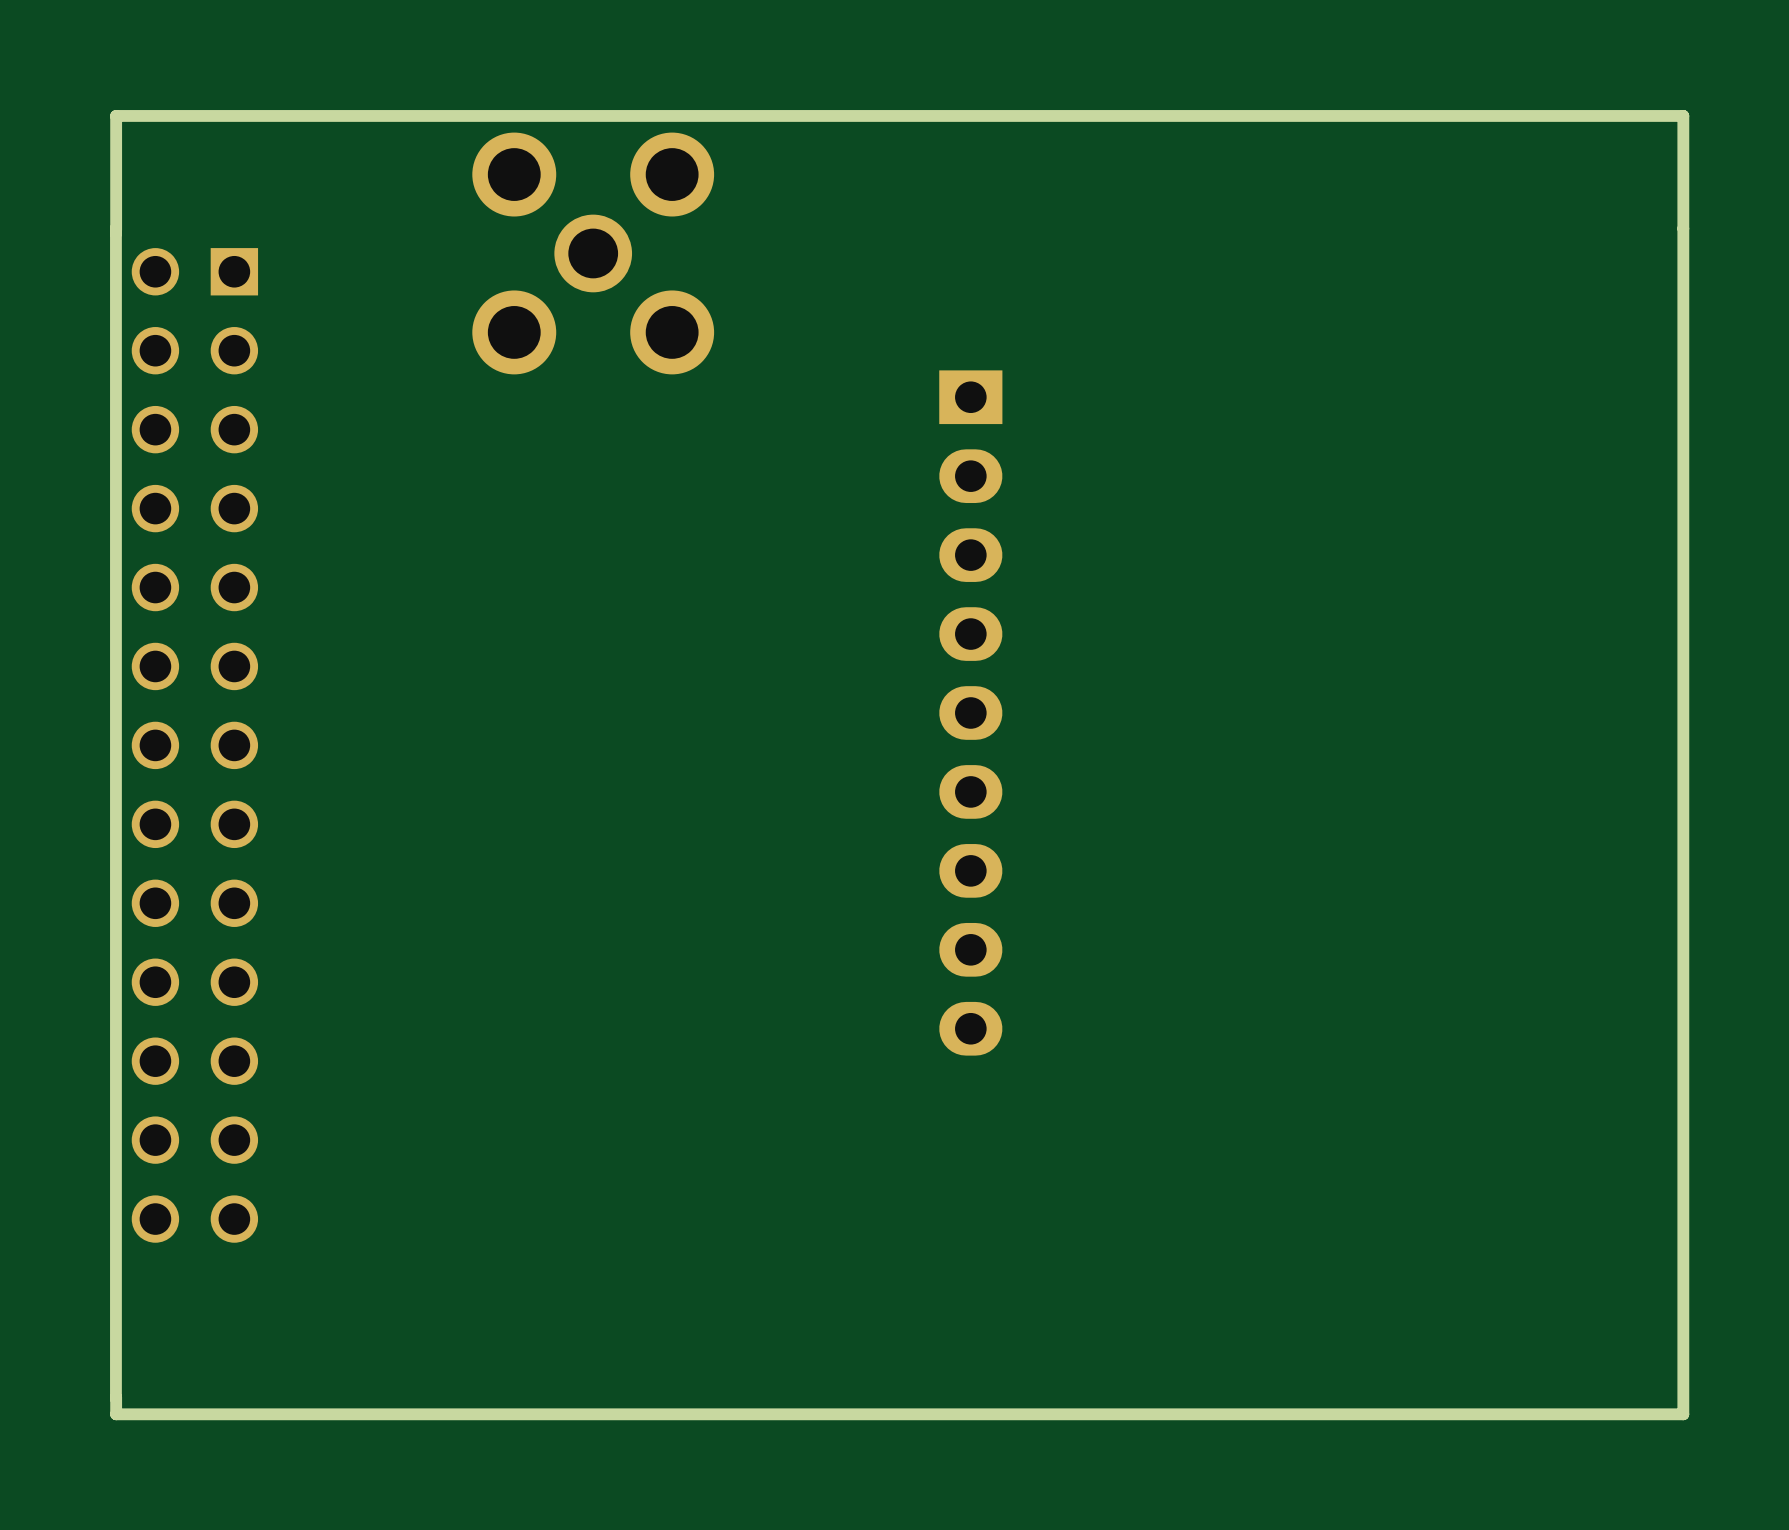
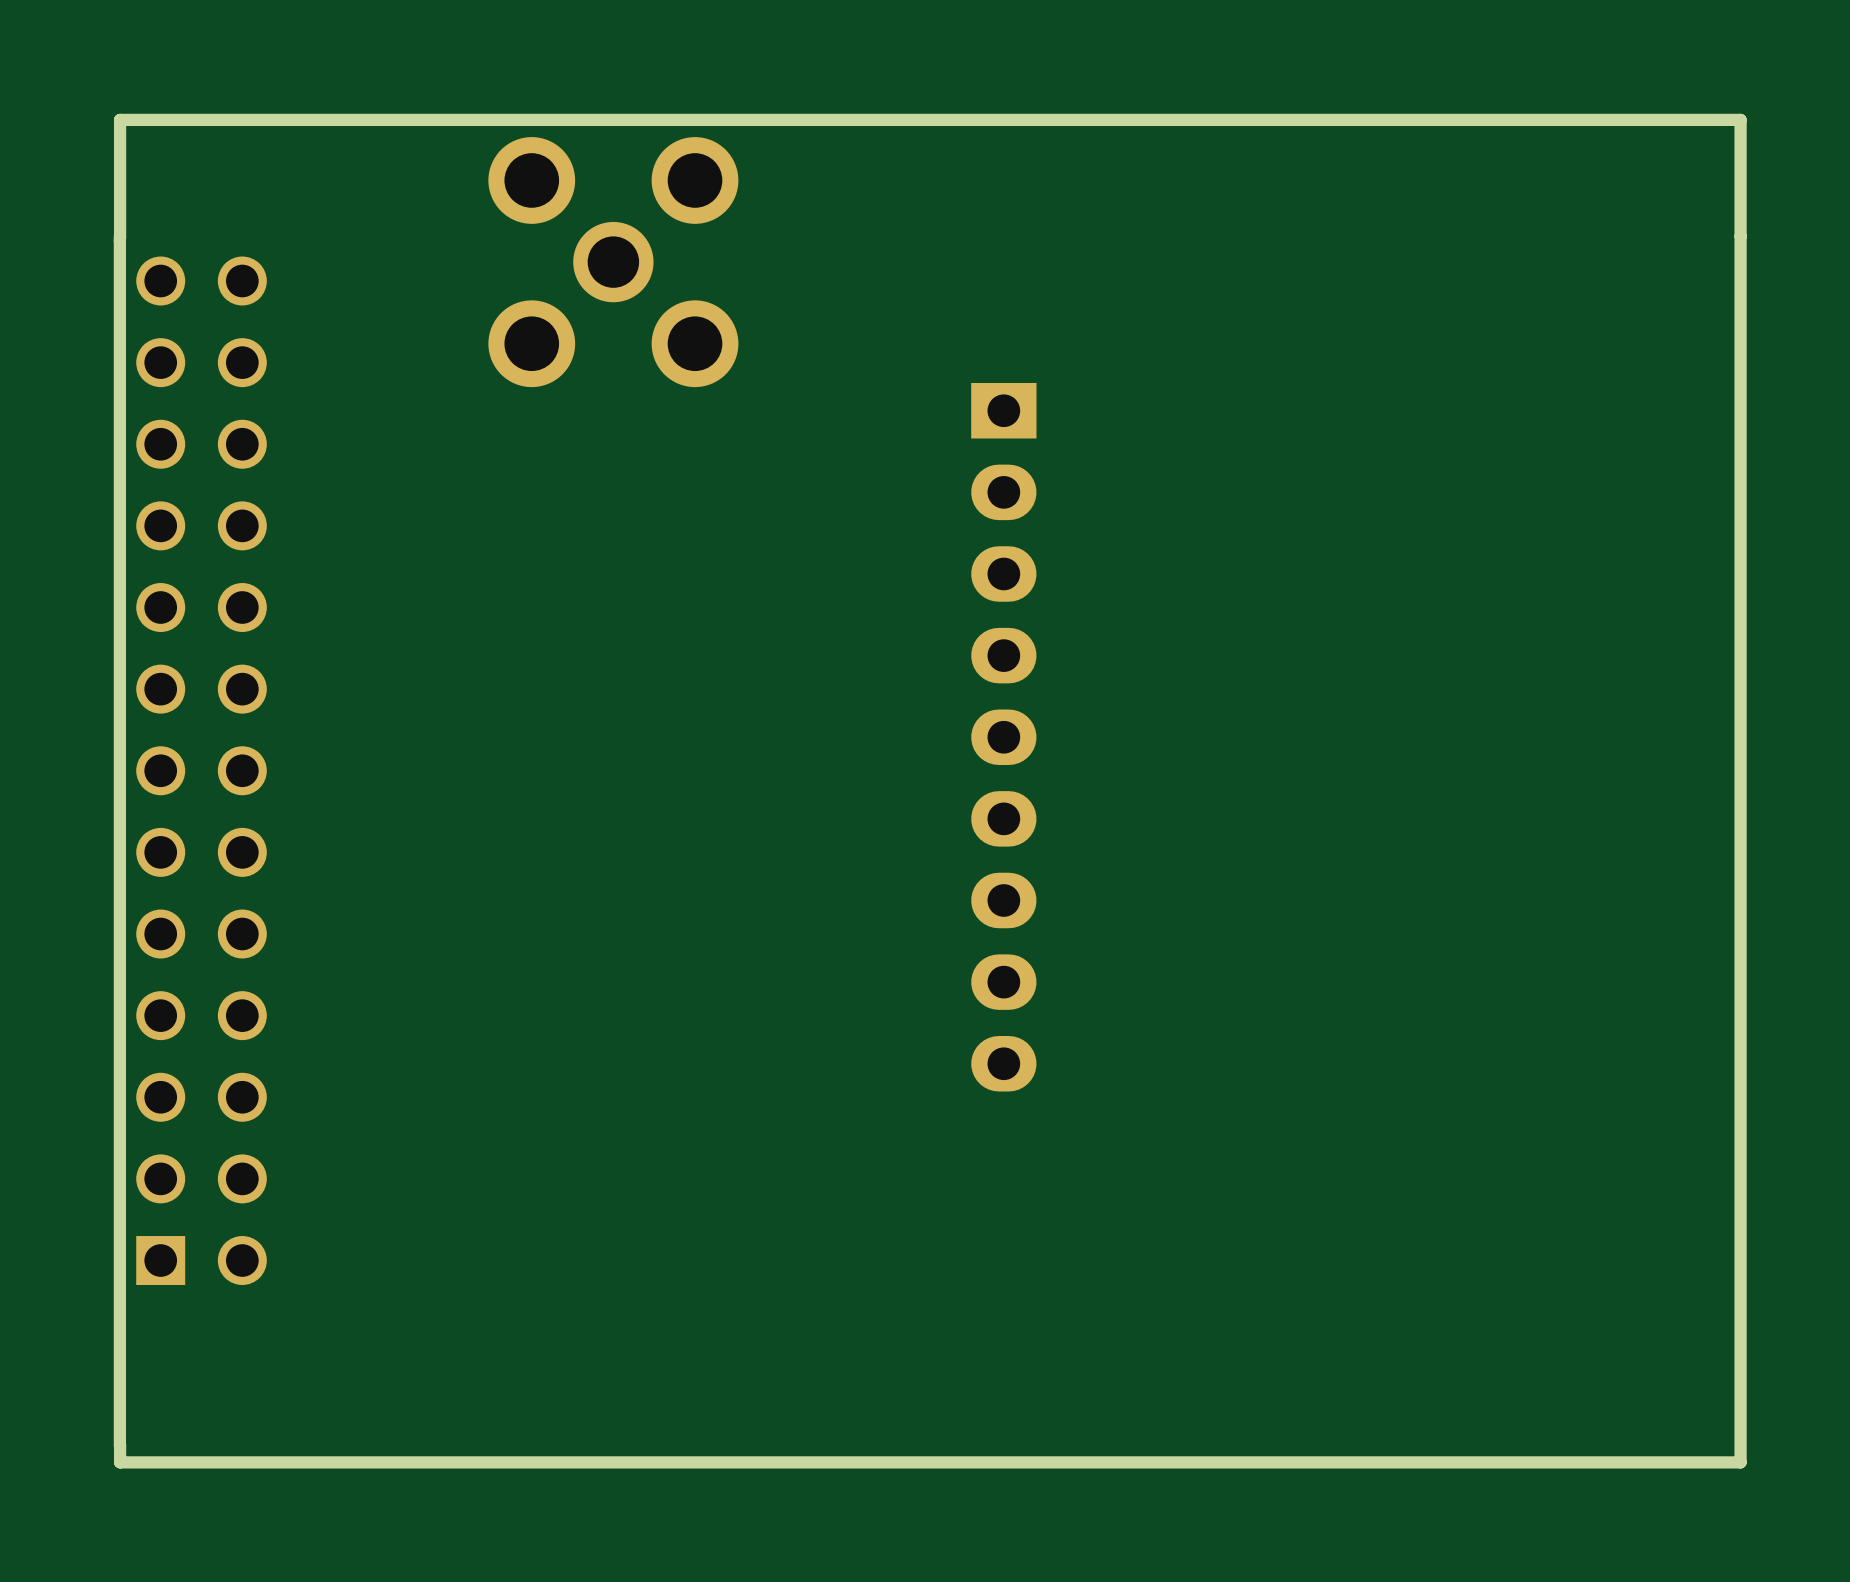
part rotation: 0° (194, 745) -> 180° (201, 770)

